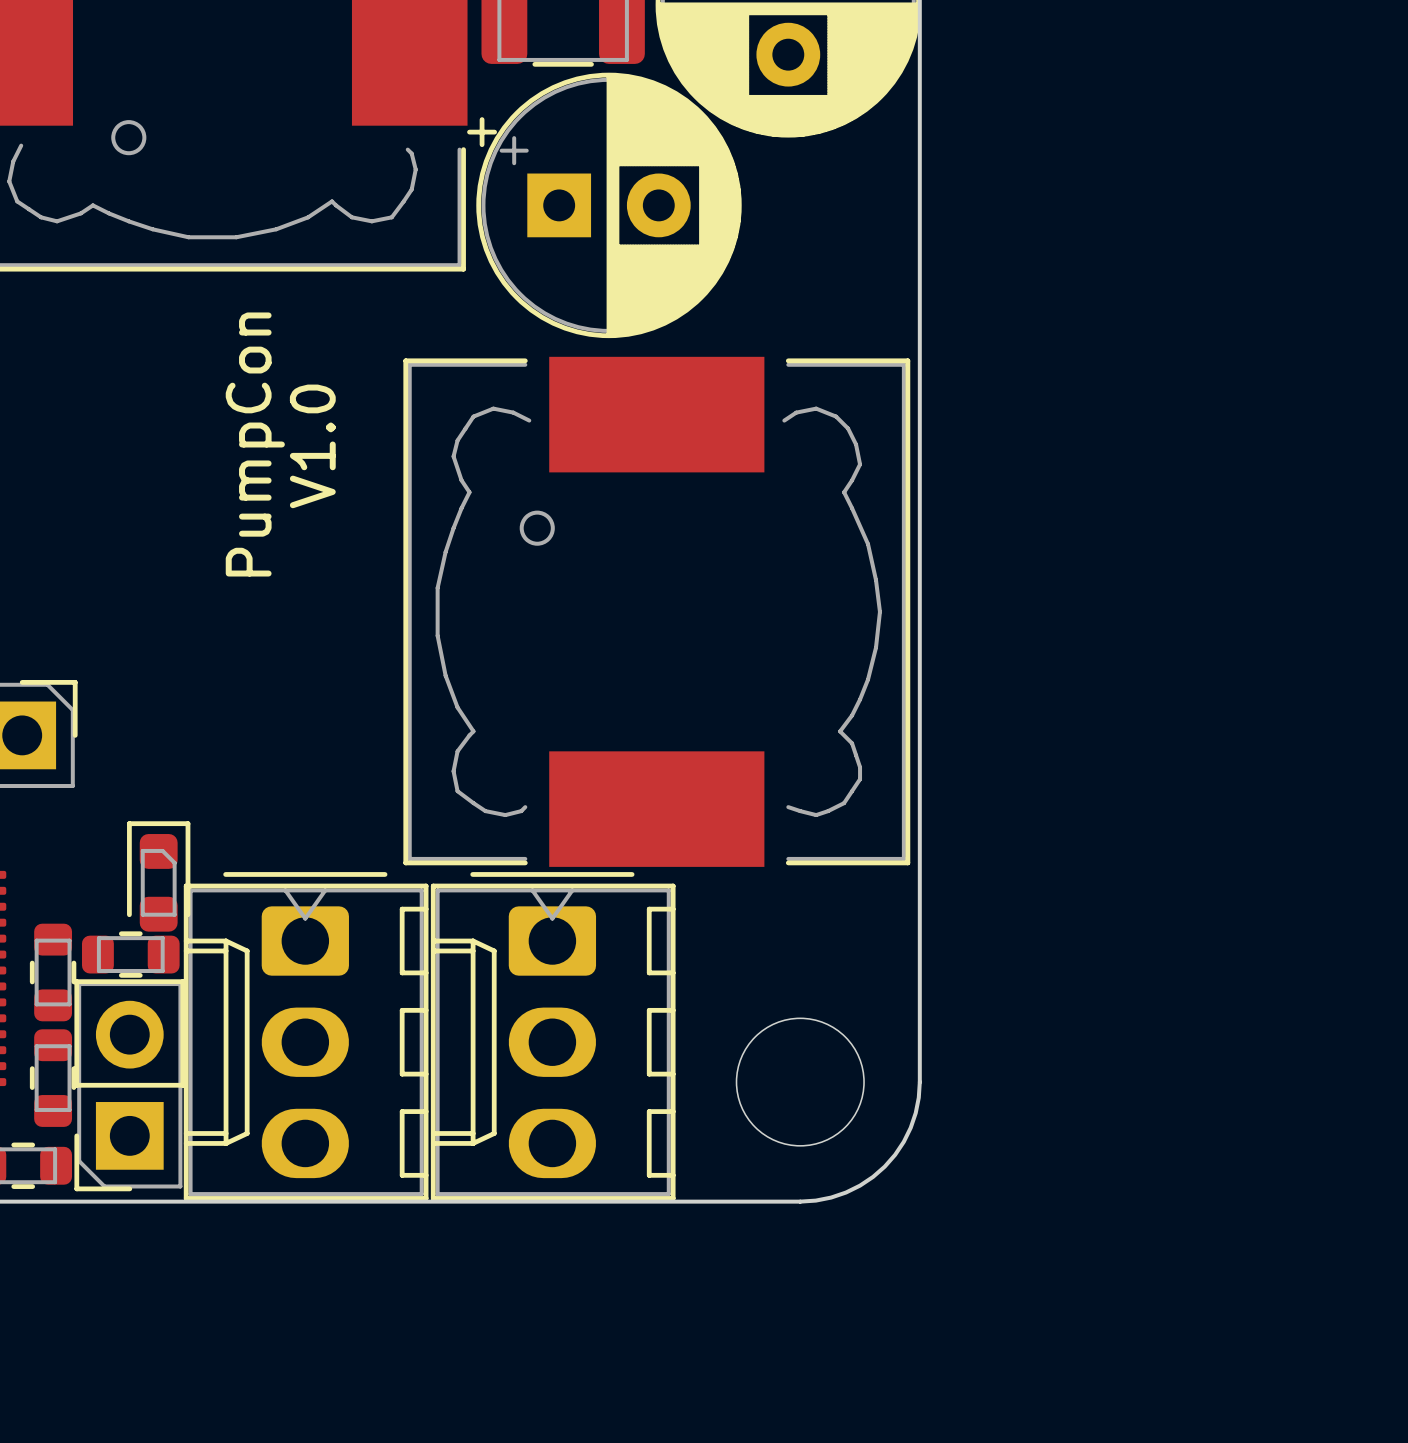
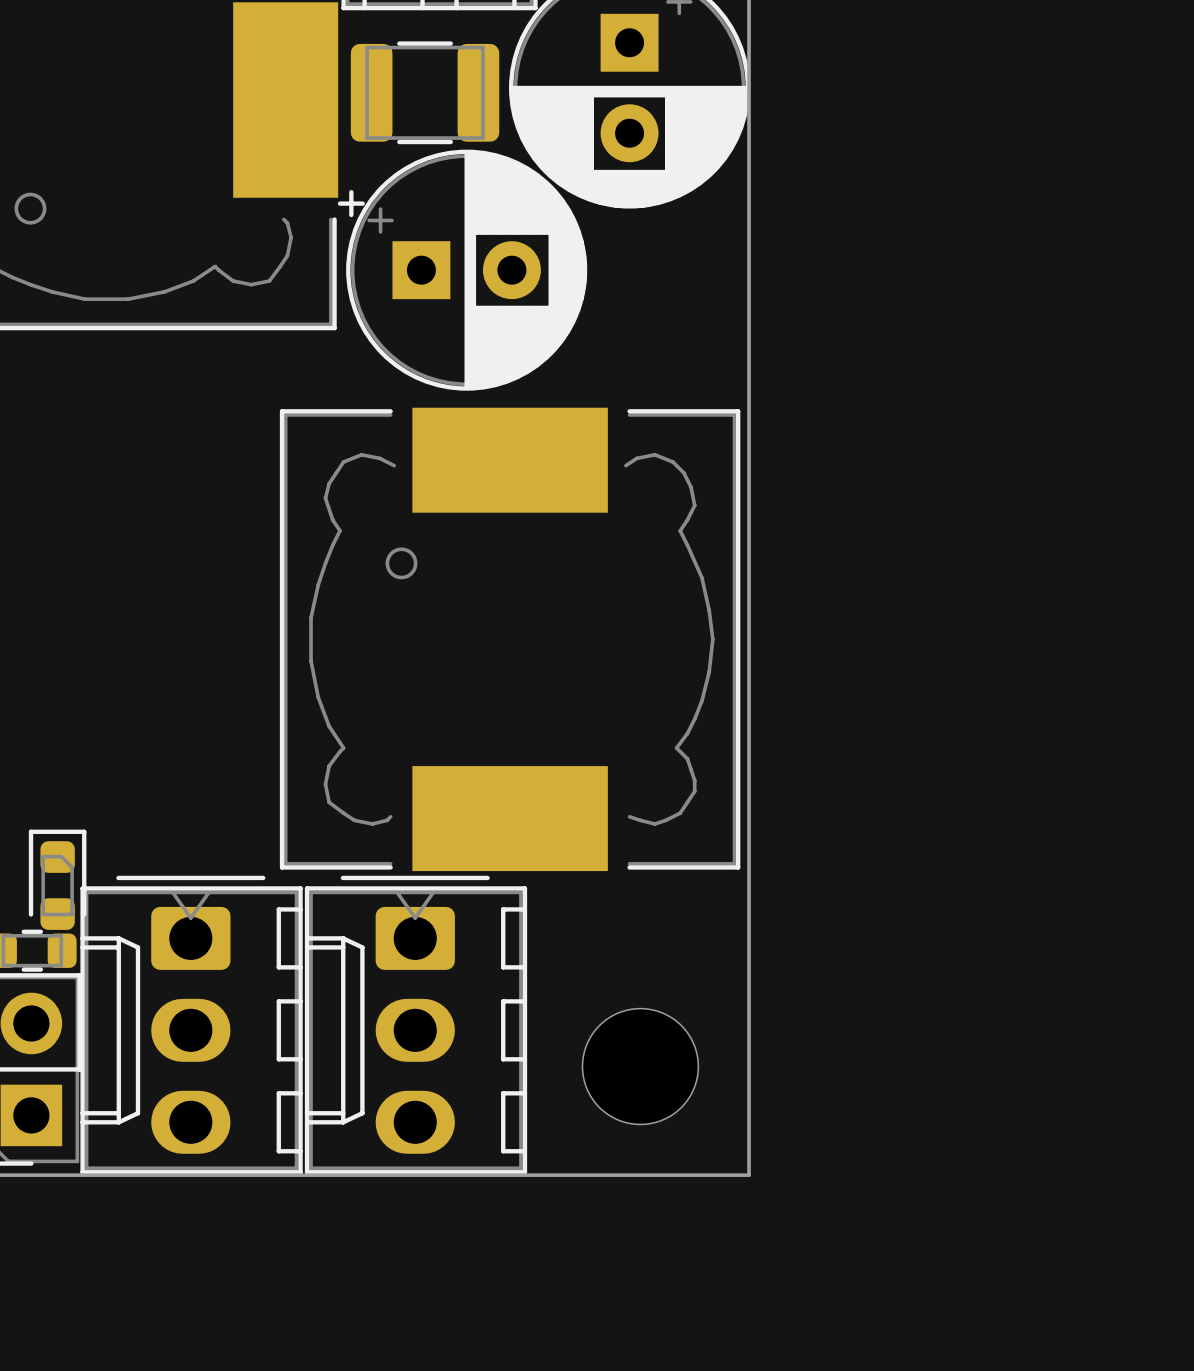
text: PumpCon (255, 444) -> none
text: V1.0 (312, 446) -> none
board edge: (919, 1082) (915, 1113) (910, 1127) (903, 1141) (884, 1166) (873, 1176) (846, 1192) (815, 1200) (800, 1201) -> (749, 1066) (749, 1175) (640, 1175)

